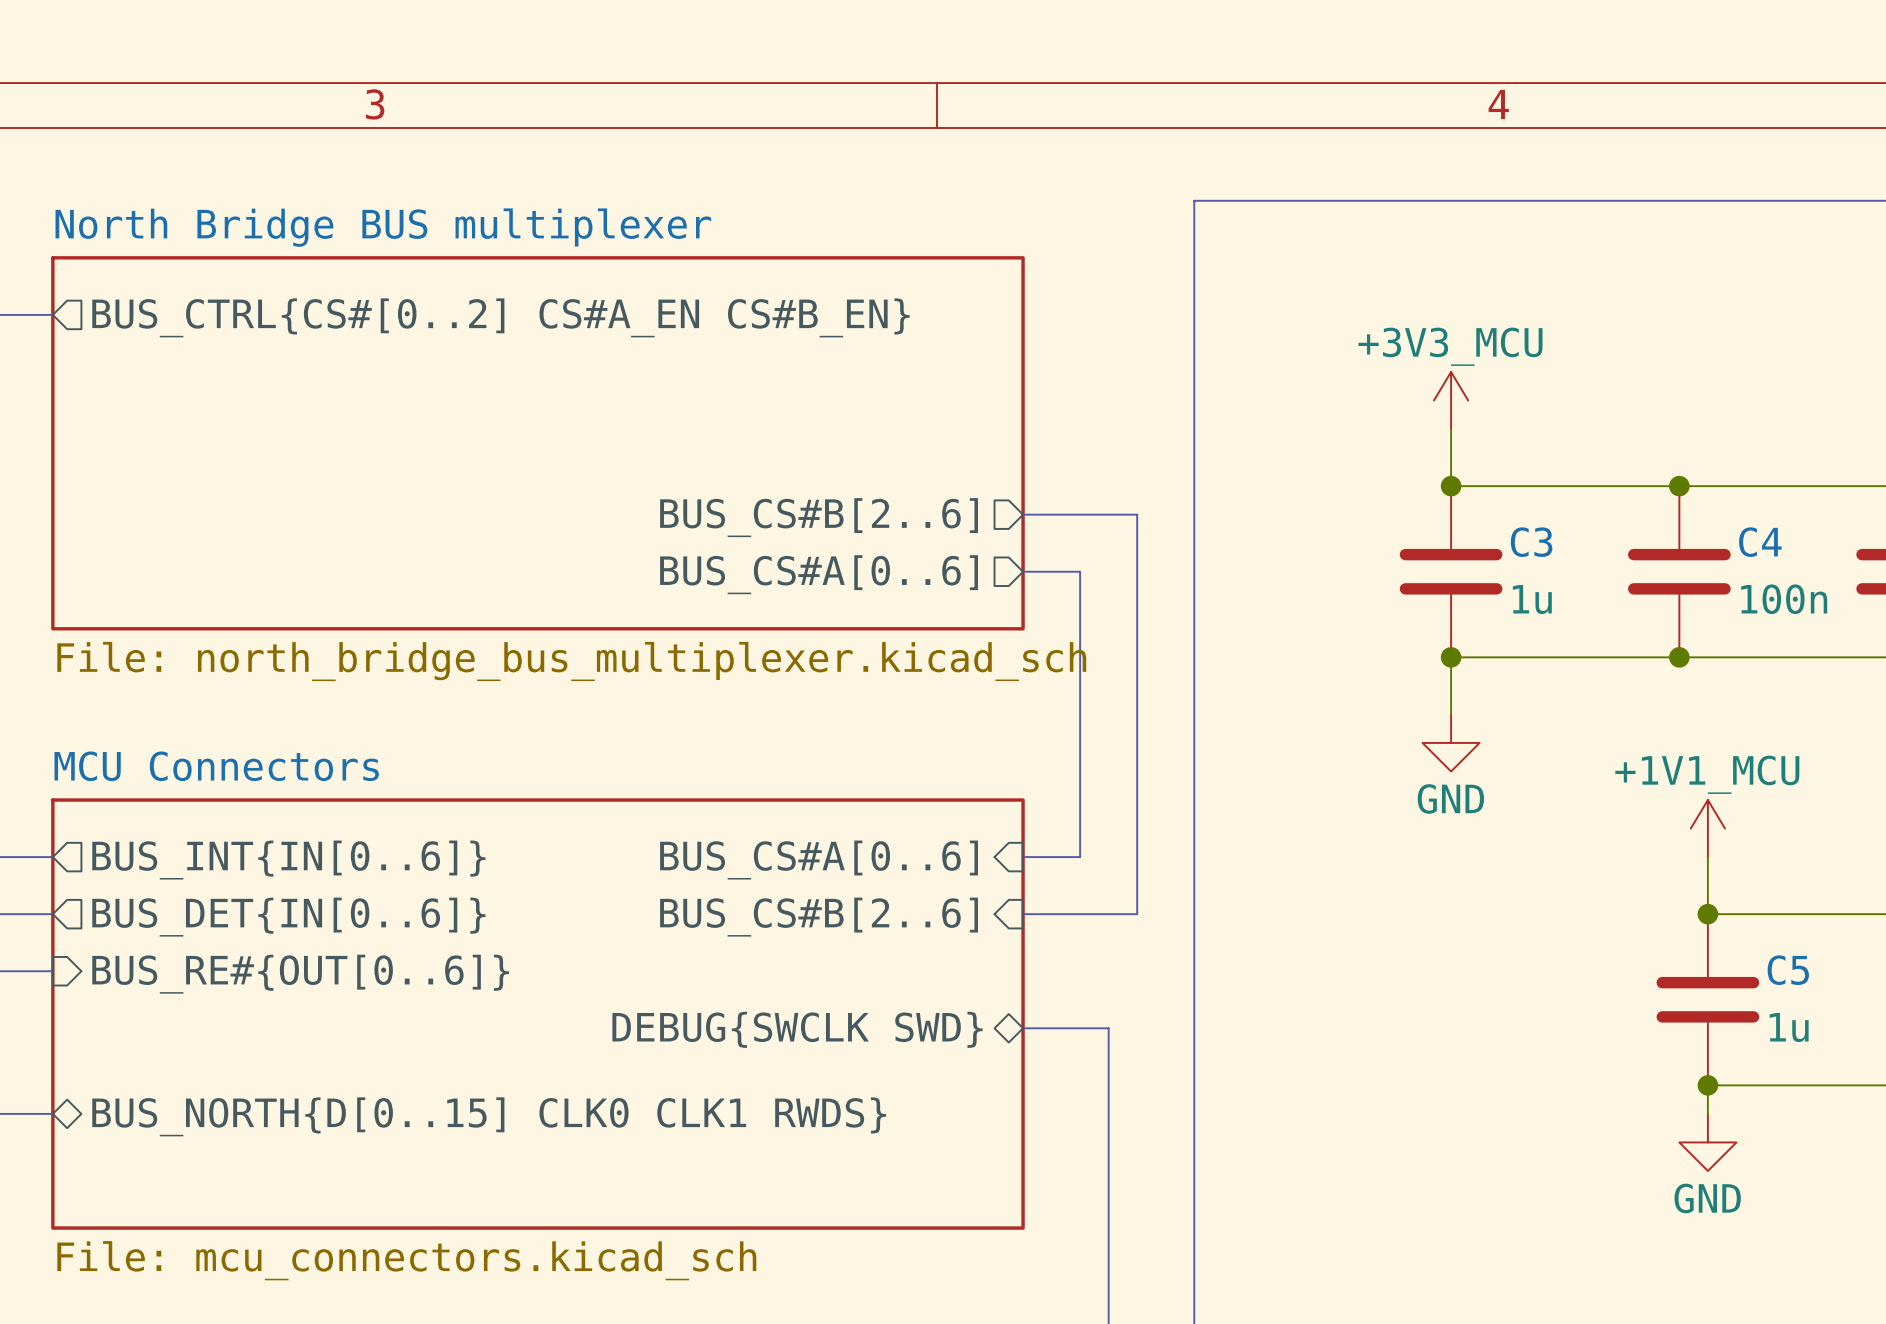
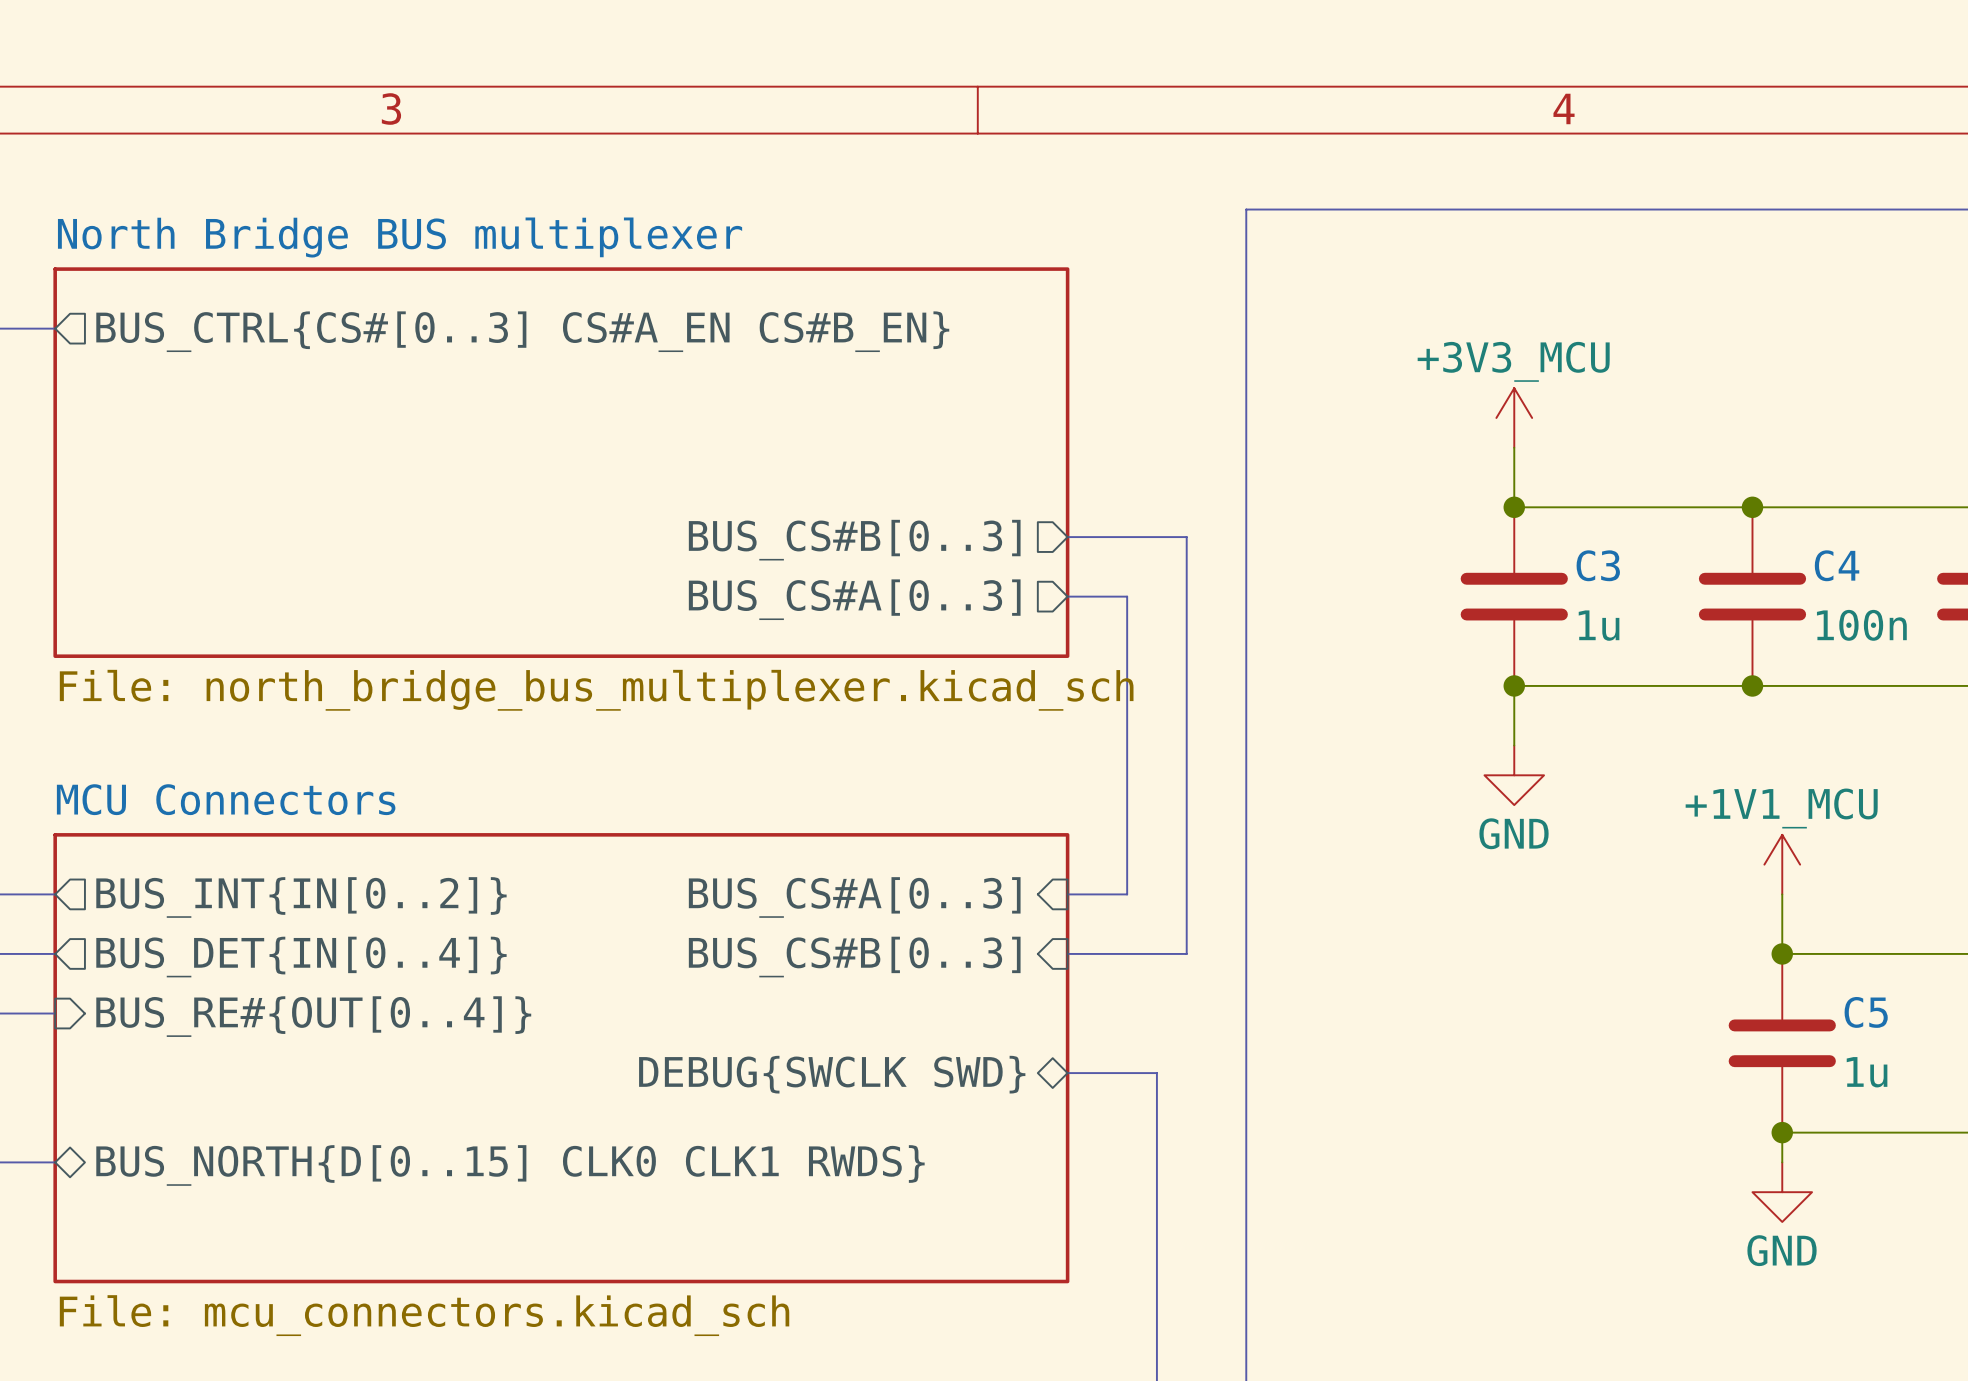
sheet pin: BUS_CTRL{CS#[0..2] CS#A_EN CS#B_EN} (500, 317) -> BUS_CTRL{CS#[0..3] CS#A_EN CS#B_EN} (522, 331)
sheet pin: BUS_CS#B[2..6] (819, 517) -> BUS_CS#B[0..3] (854, 540)
sheet pin: BUS_CS#A[0..6] (819, 574) -> BUS_CS#A[0..3] (854, 599)
sheet pin: BUS_INT{IN[0..6]} (288, 860) -> BUS_INT{IN[0..2]} (301, 897)
sheet pin: BUS_CS#A[0..6] (819, 860) -> BUS_CS#A[0..3] (854, 897)
sheet pin: BUS_DET{IN[0..6]} (288, 917) -> BUS_DET{IN[0..4]} (301, 957)
sheet pin: BUS_CS#B[2..6] (819, 917) -> BUS_CS#B[0..3] (854, 957)
sheet pin: BUS_RE#{OUT[0..6]} (300, 974) -> BUS_RE#{OUT[0..4]} (313, 1016)

